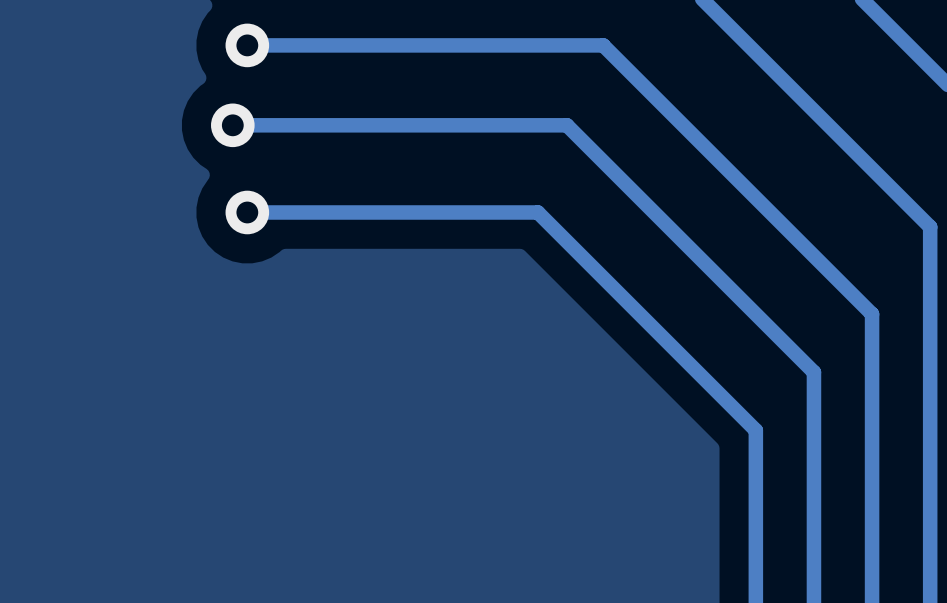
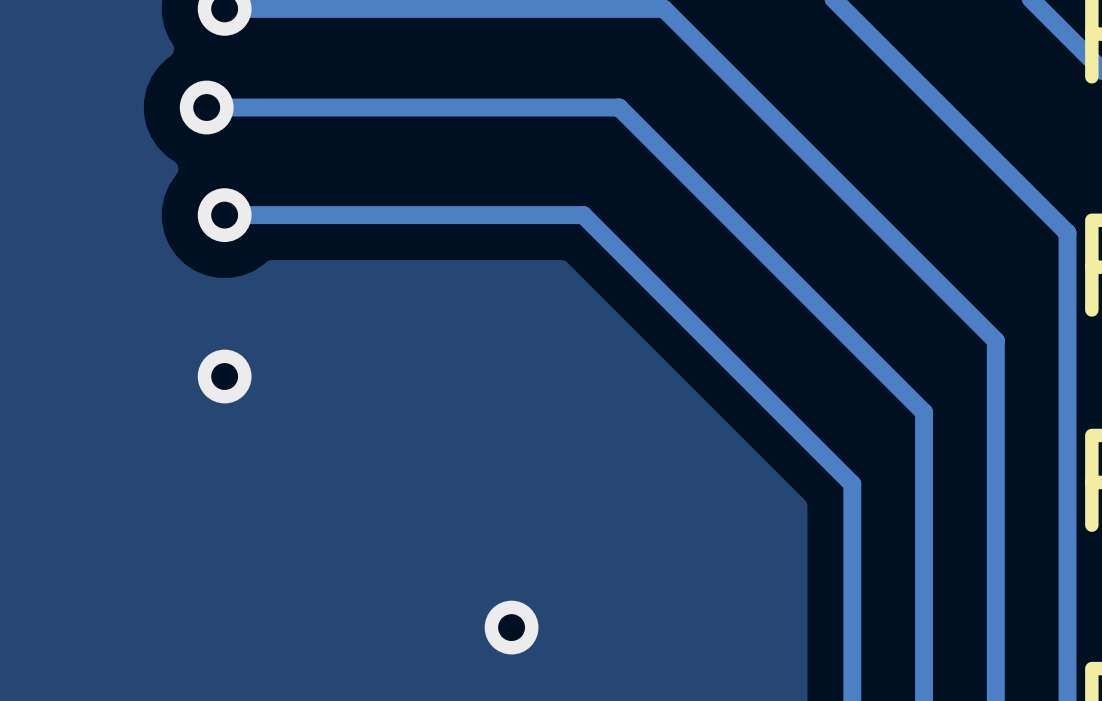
via: none -> (224, 376)
via: none -> (511, 627)

